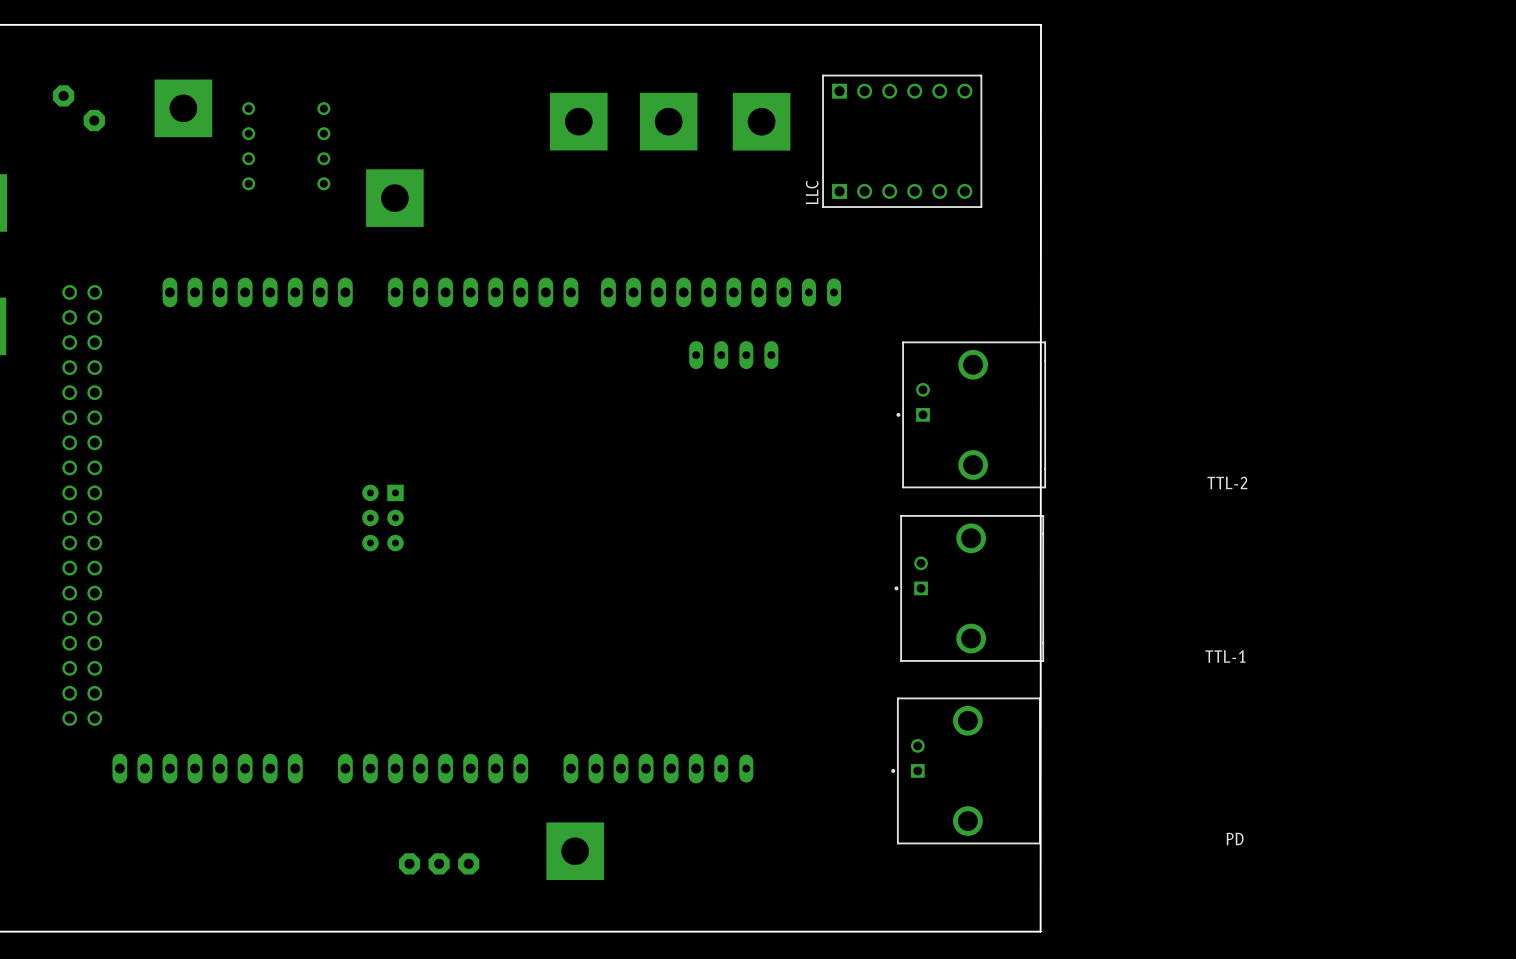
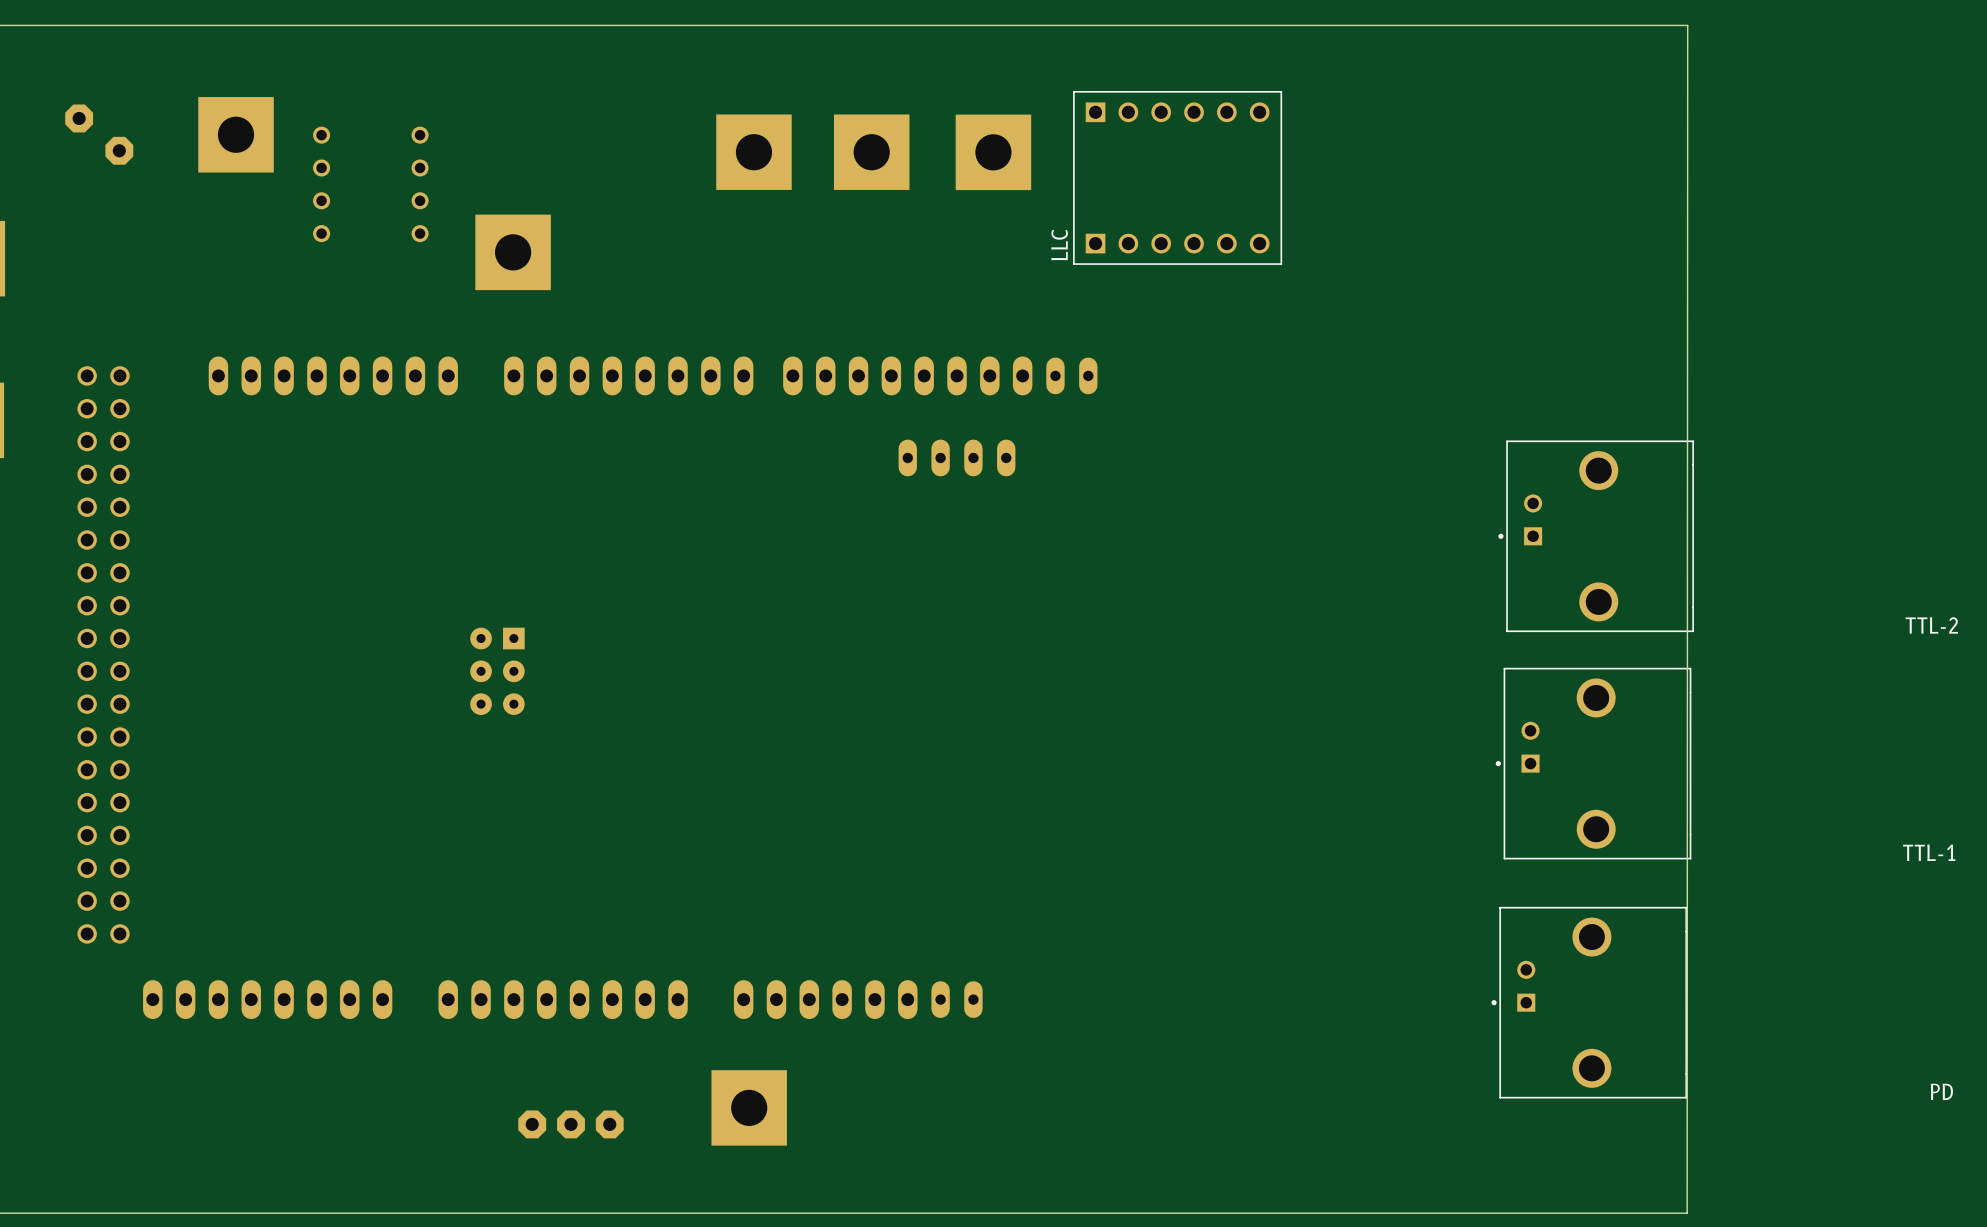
board edge: (1041, 24) (1040, 931) -> (1359, 25) (1687, 25) (1687, 1213) (1358, 1213)
TTL-2 position: (971, 414) -> (1596, 536)
TTL-1 position: (969, 588) -> (1593, 763)
PD: (965, 770) -> none
PD: none -> (1589, 1002)

